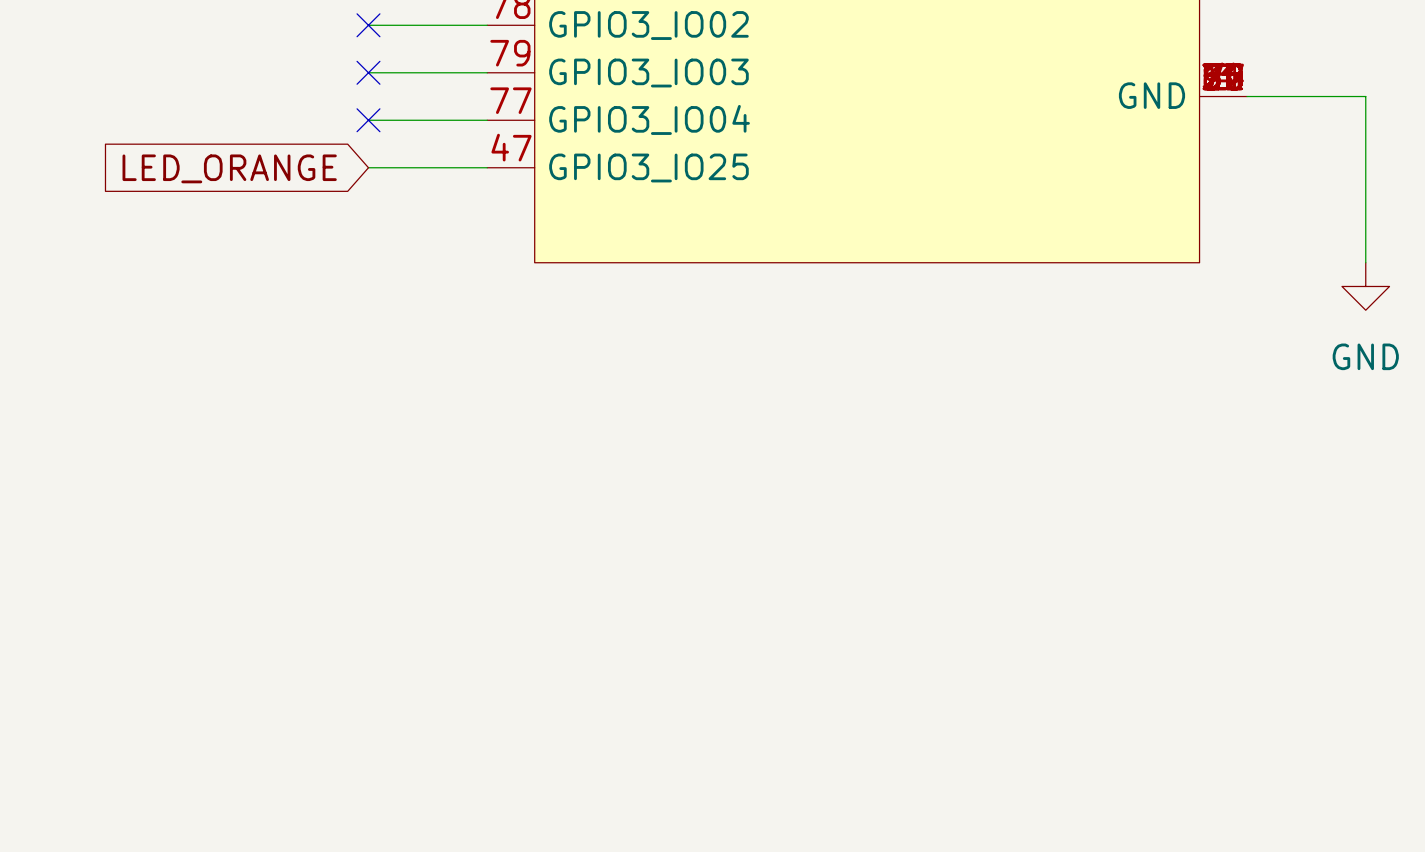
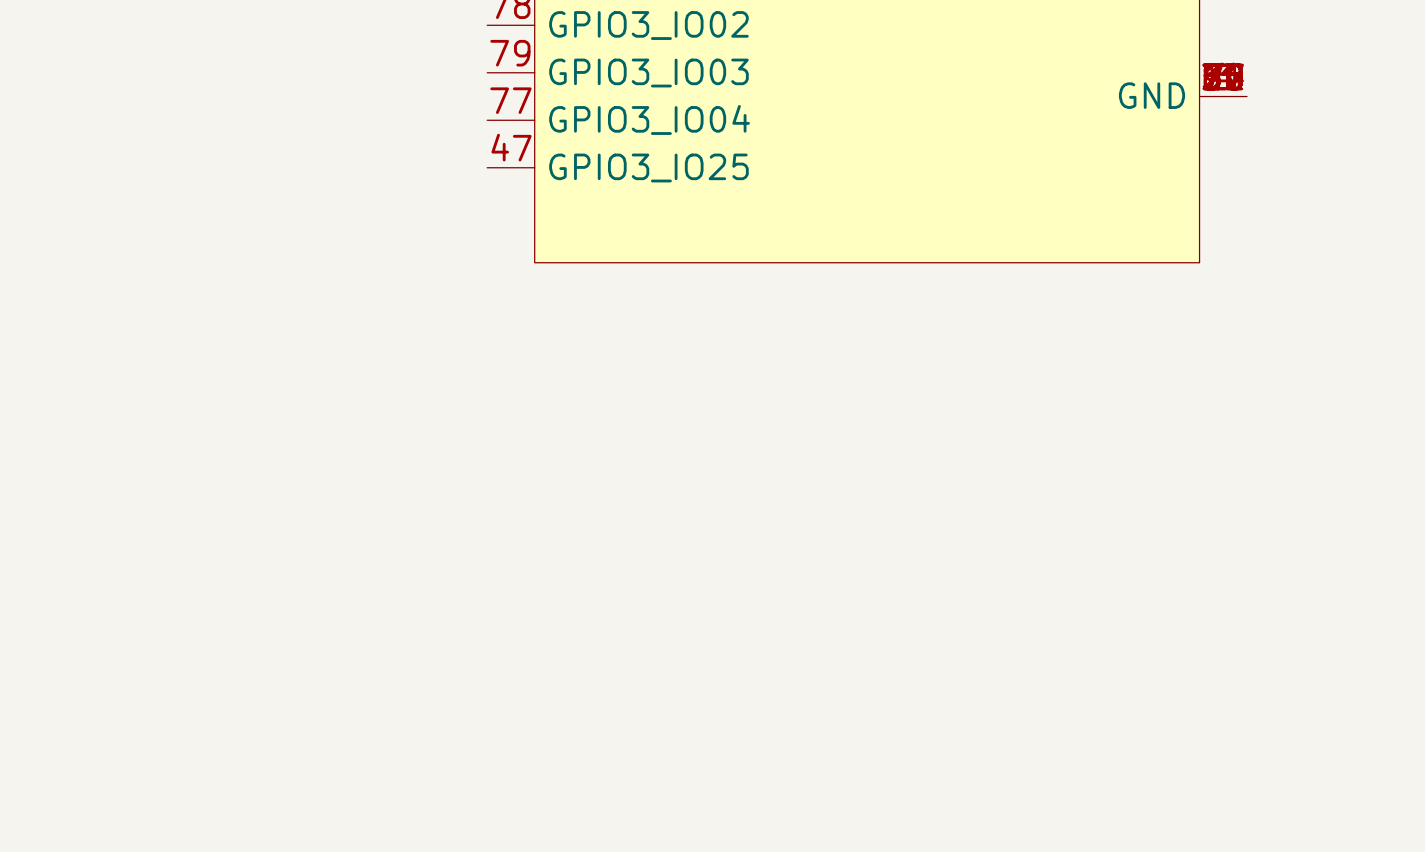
wire: (368, 25) (487, 25) -> none
no-connect mark: (368, 25) -> none
wire: (368, 72) (487, 72) -> none
no-connect mark: (368, 72) -> none
wire: (1247, 96) (1365, 96) (1365, 262) -> none
wire: (368, 120) (487, 120) -> none
no-connect mark: (368, 120) -> none
wire: (368, 167) (487, 167) -> none
global label: LED_ORANGE (229, 168) -> none
power symbol: GND (1365, 286) -> none

